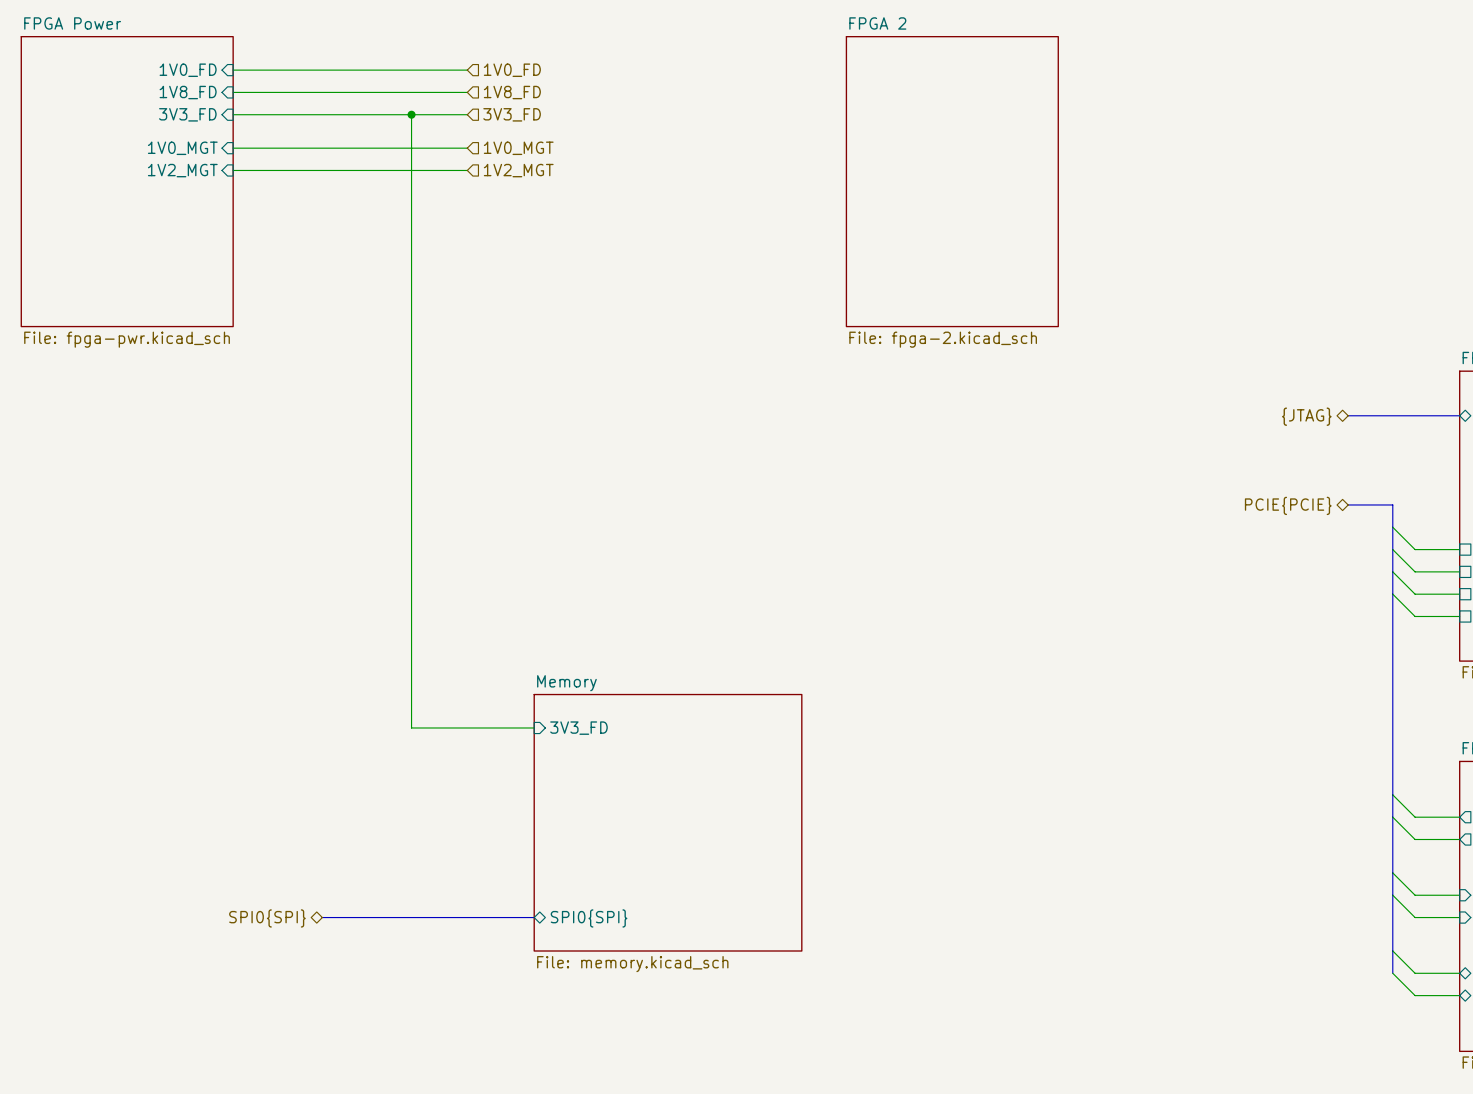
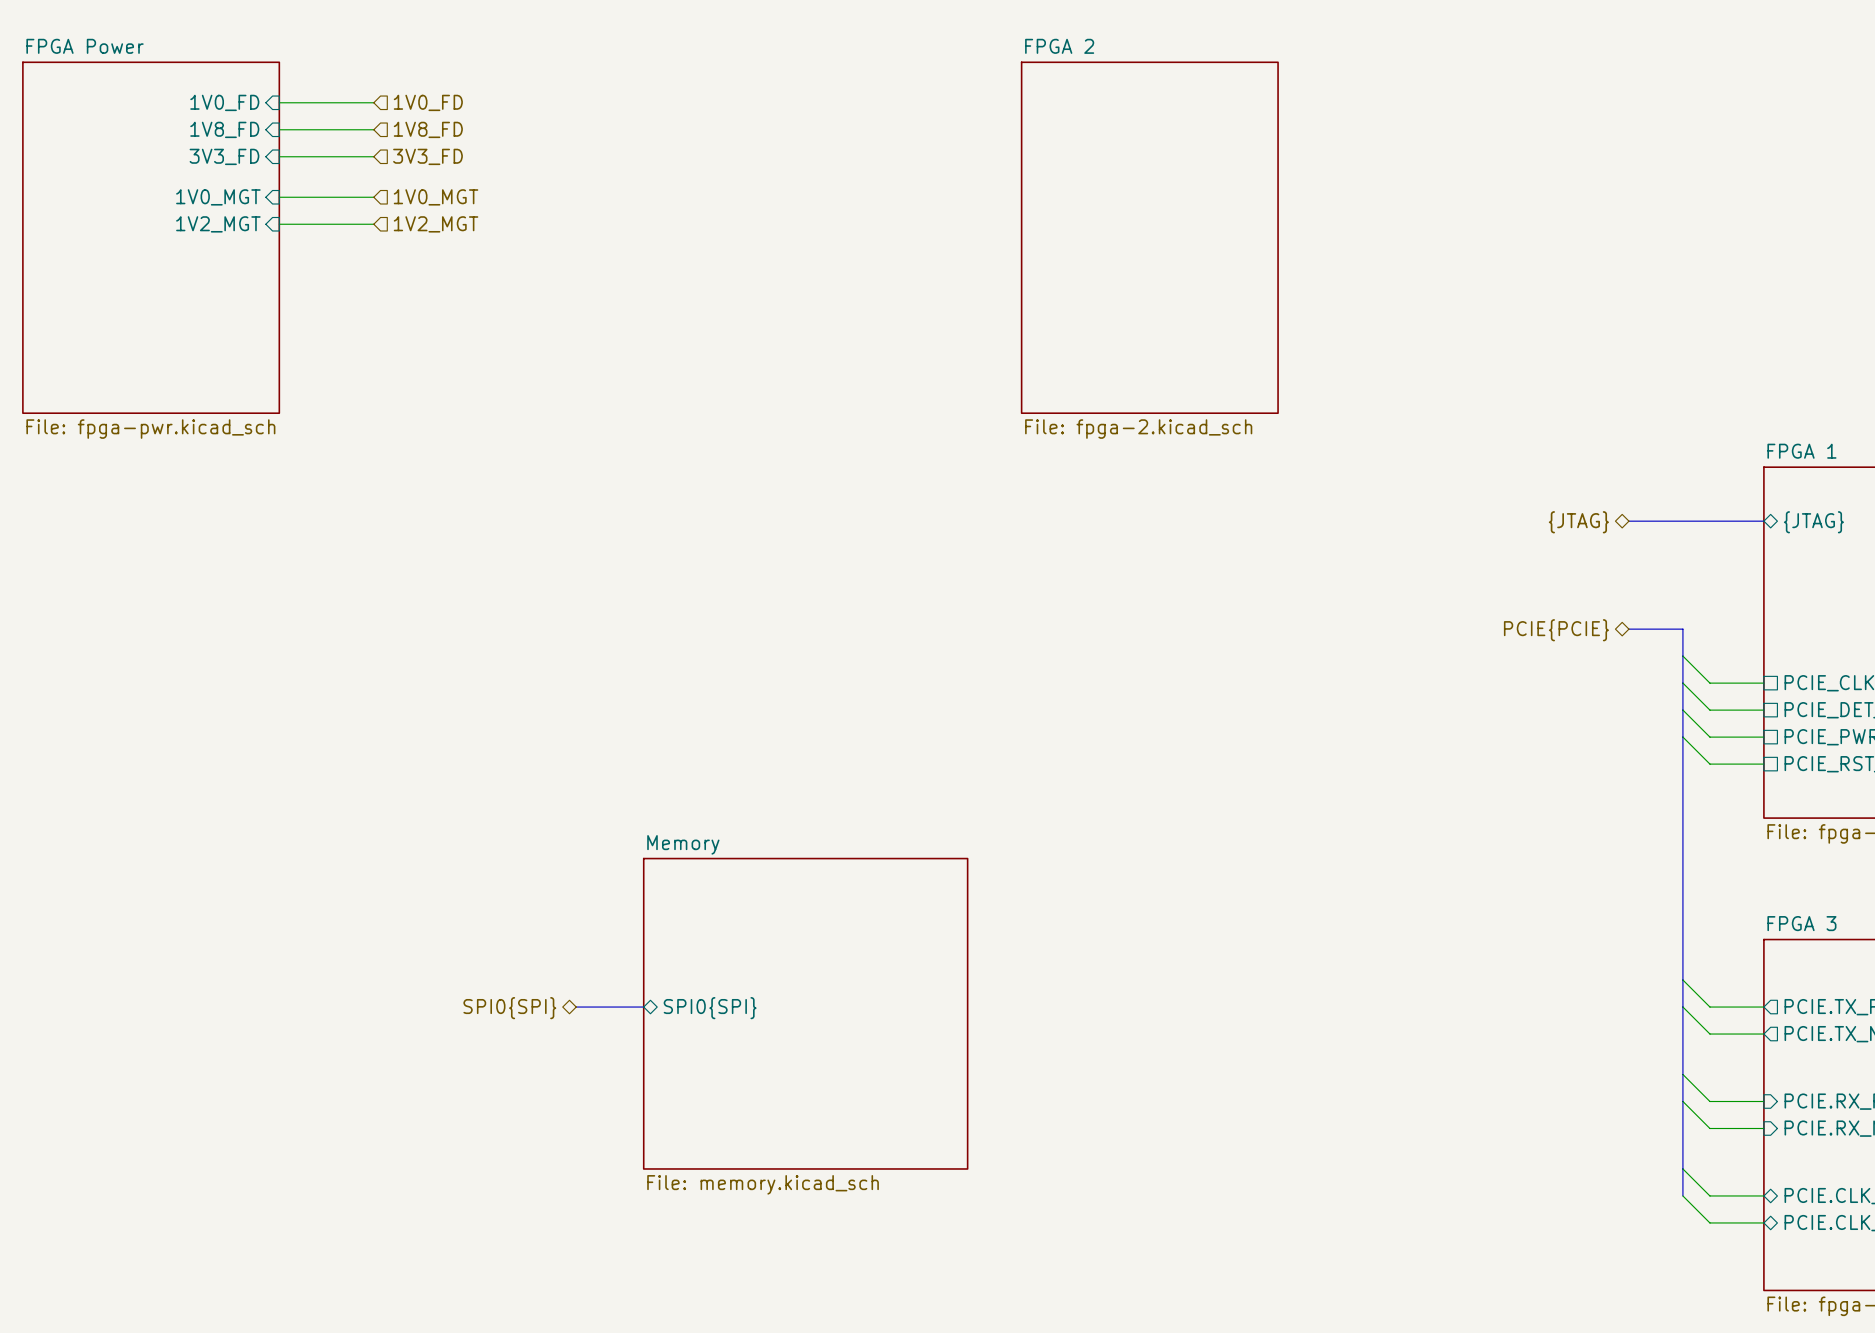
wire: (311, 70) (467, 70) -> none
hierarchical label position: 1V0_FD (512, 70) -> 1V0_FD (428, 102)
wire: (311, 92) (467, 92) -> none
hierarchical label position: 1V8_FD (512, 92) -> 1V8_FD (428, 129)
wire: (311, 114) (467, 114) -> none
wire: (411, 114) (411, 727) (534, 727) -> none
junction: (411, 114) -> none
hierarchical label position: 3V3_FD (512, 114) -> 3V3_FD (427, 156)
wire: (311, 148) (467, 148) -> none
hierarchical label position: 1V0_MGT (518, 148) -> 1V0_MGT (436, 197)
wire: (311, 170) (467, 170) -> none
hierarchical label position: 1V2_MGT (518, 170) -> 1V2_MGT (436, 224)
sheet pin: 3V3_FD (578, 728) -> none
bus: none -> (576, 1007) (643, 1007)
bus: (322, 917) (534, 917) -> none
hierarchical label position: SPI0{SPI} (267, 918) -> SPI0{SPI} (509, 1008)
sheet pin position: SPI0{SPI} (589, 918) -> SPI0{SPI} (710, 1008)

